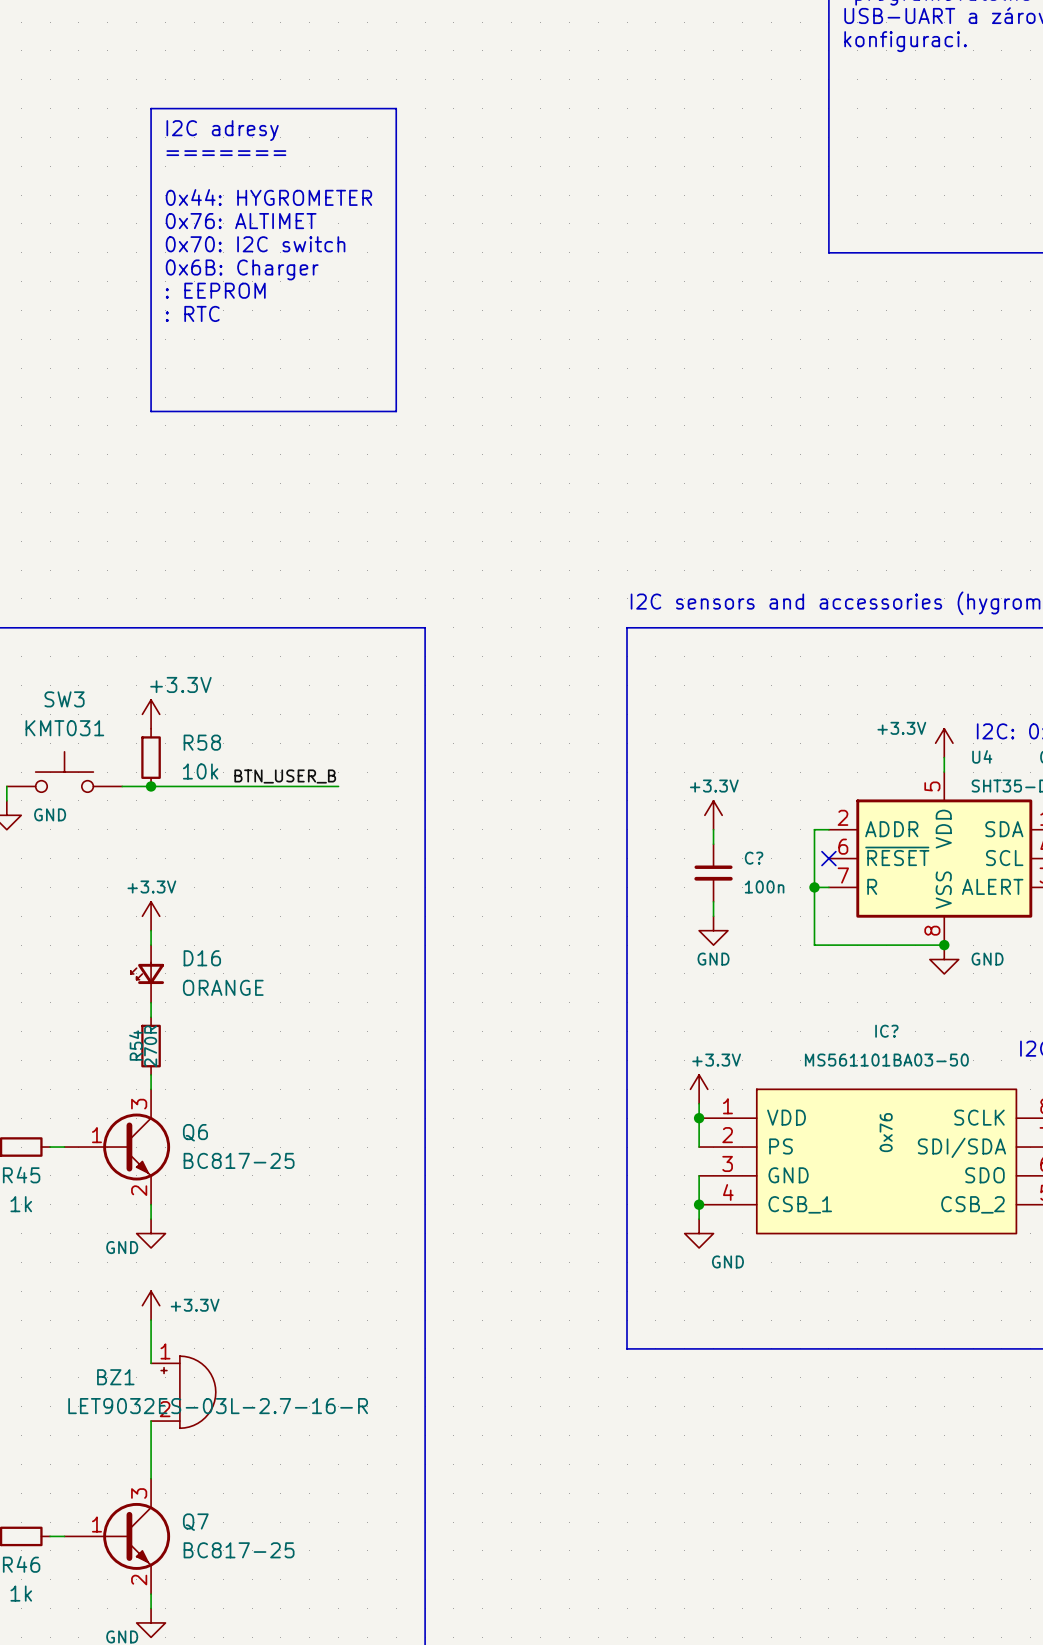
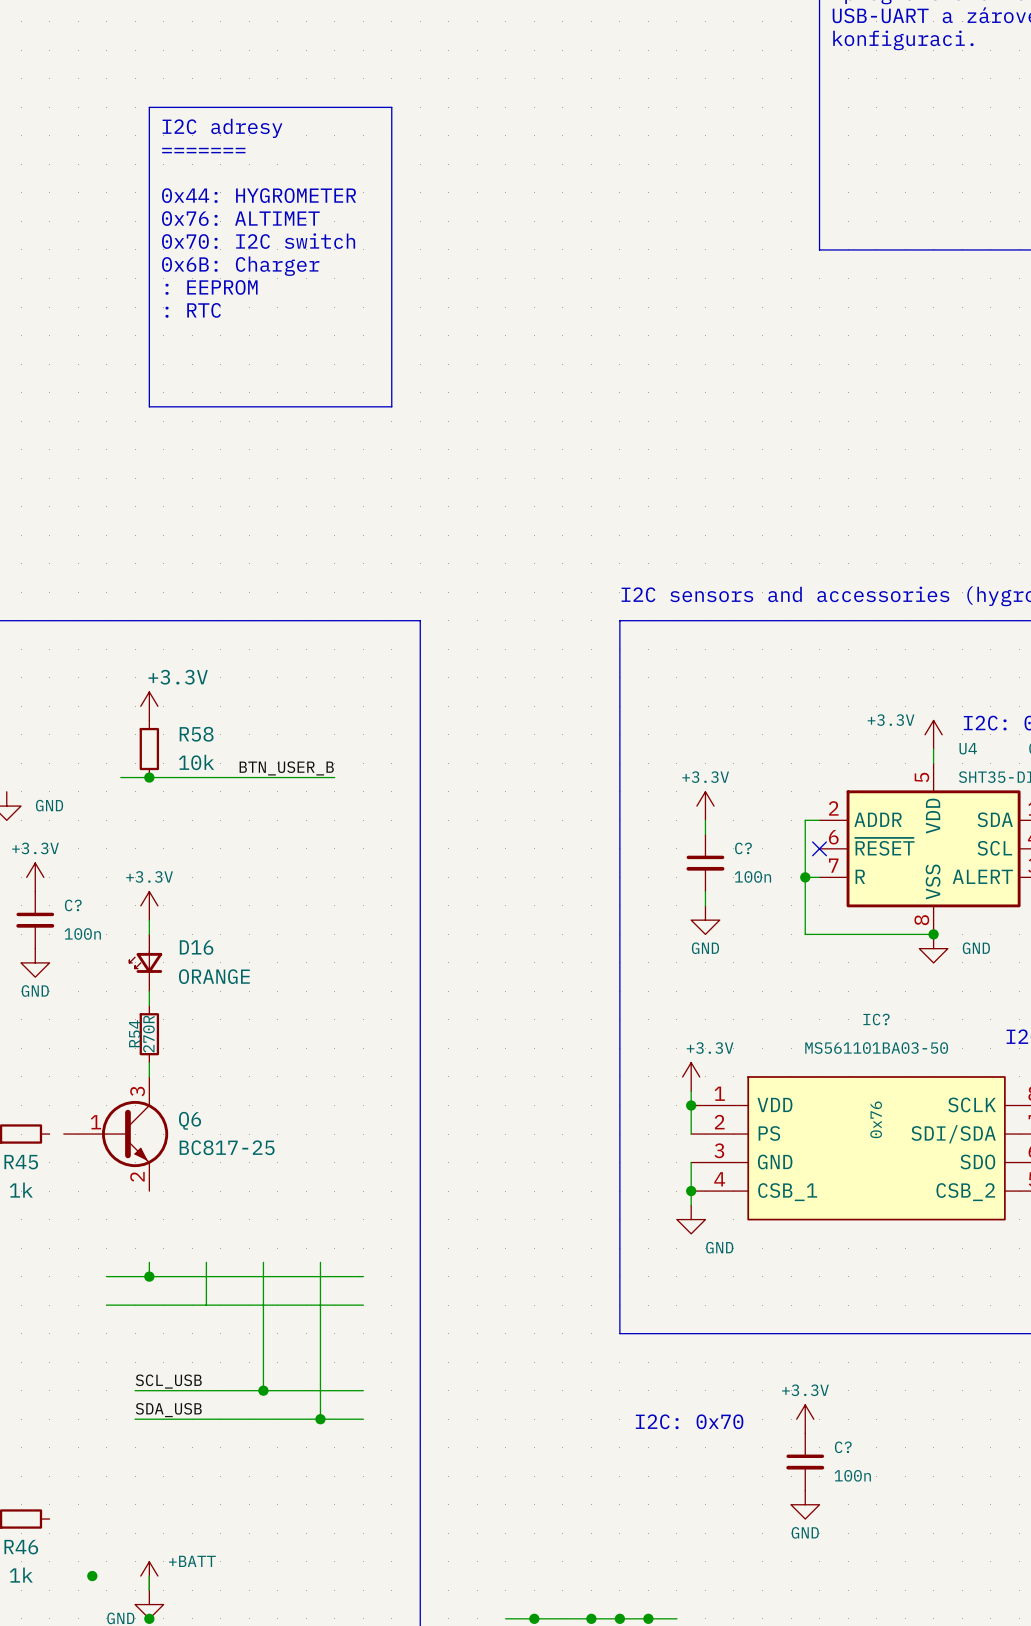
SW3: KMT031 (64, 772) -> none
wire: (6, 786) (6, 800) -> none
power symbol: none -> +3.3V (35, 877)
C?: none -> 100n (35, 920)
power symbol: none -> GND (35, 962)
wire: (50, 1147) (64, 1147) -> none
wire: (151, 1204) (151, 1219) -> (149, 1262) (149, 1276)
power symbol: GND (151, 1233) -> none
wire: none -> (263, 1262) (263, 1390)
wire: none -> (320, 1262) (320, 1419)
wire: none -> (106, 1276) (363, 1276)
junction: none -> (149, 1276)
power symbol: +3.3V (151, 1305) -> none
wire: none -> (106, 1305) (363, 1305)
wire: (151, 1320) (151, 1363) -> (206, 1262) (206, 1305)
BZ1: LET9032ES-03L-2.7-16-R (183, 1392) -> none
label: none -> SCL_USB (168, 1381)
wire: none -> (135, 1390) (363, 1390)
junction: none -> (263, 1390)
wire: (151, 1421) (151, 1478) -> none
label: none -> SDA_USB (168, 1410)
wire: none -> (135, 1419) (363, 1419)
junction: none -> (320, 1419)
power symbol: none -> +3.3V (805, 1419)
text: none -> I2C: 0x70 (689, 1421)
C?: none -> 100n (805, 1461)
power symbol: none -> GND (805, 1504)
wire: (50, 1536) (64, 1536) -> none
Q7: BC817-25 (117, 1536) -> none
junction: none -> (92, 1576)
power symbol: none -> +BATT (149, 1576)
junction: none -> (149, 1618)
wire: none -> (505, 1618) (676, 1618)
junction: none -> (534, 1618)
junction: none -> (591, 1618)
junction: none -> (619, 1618)
junction: none -> (648, 1618)

